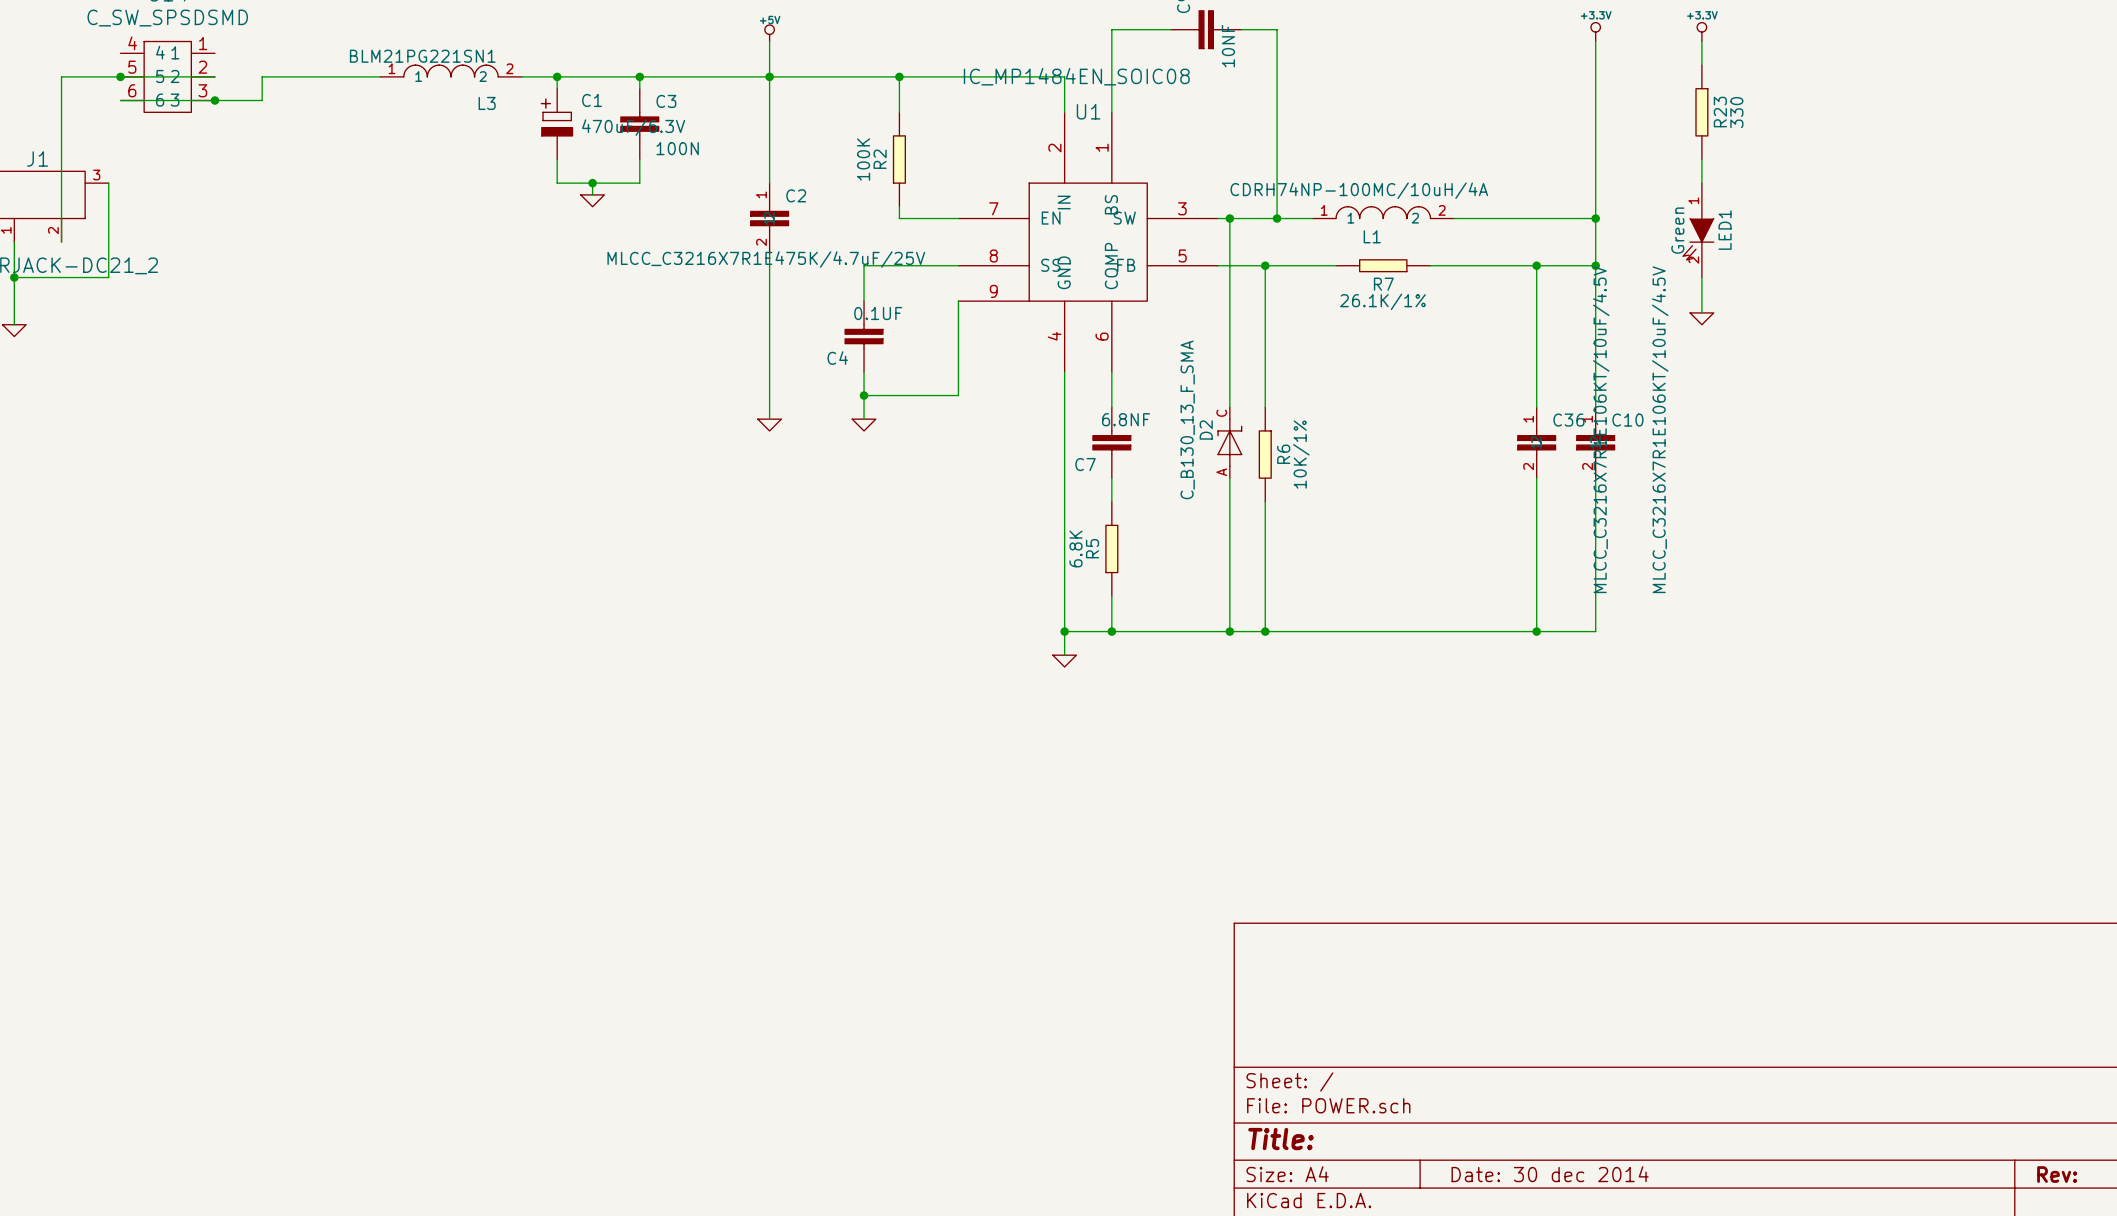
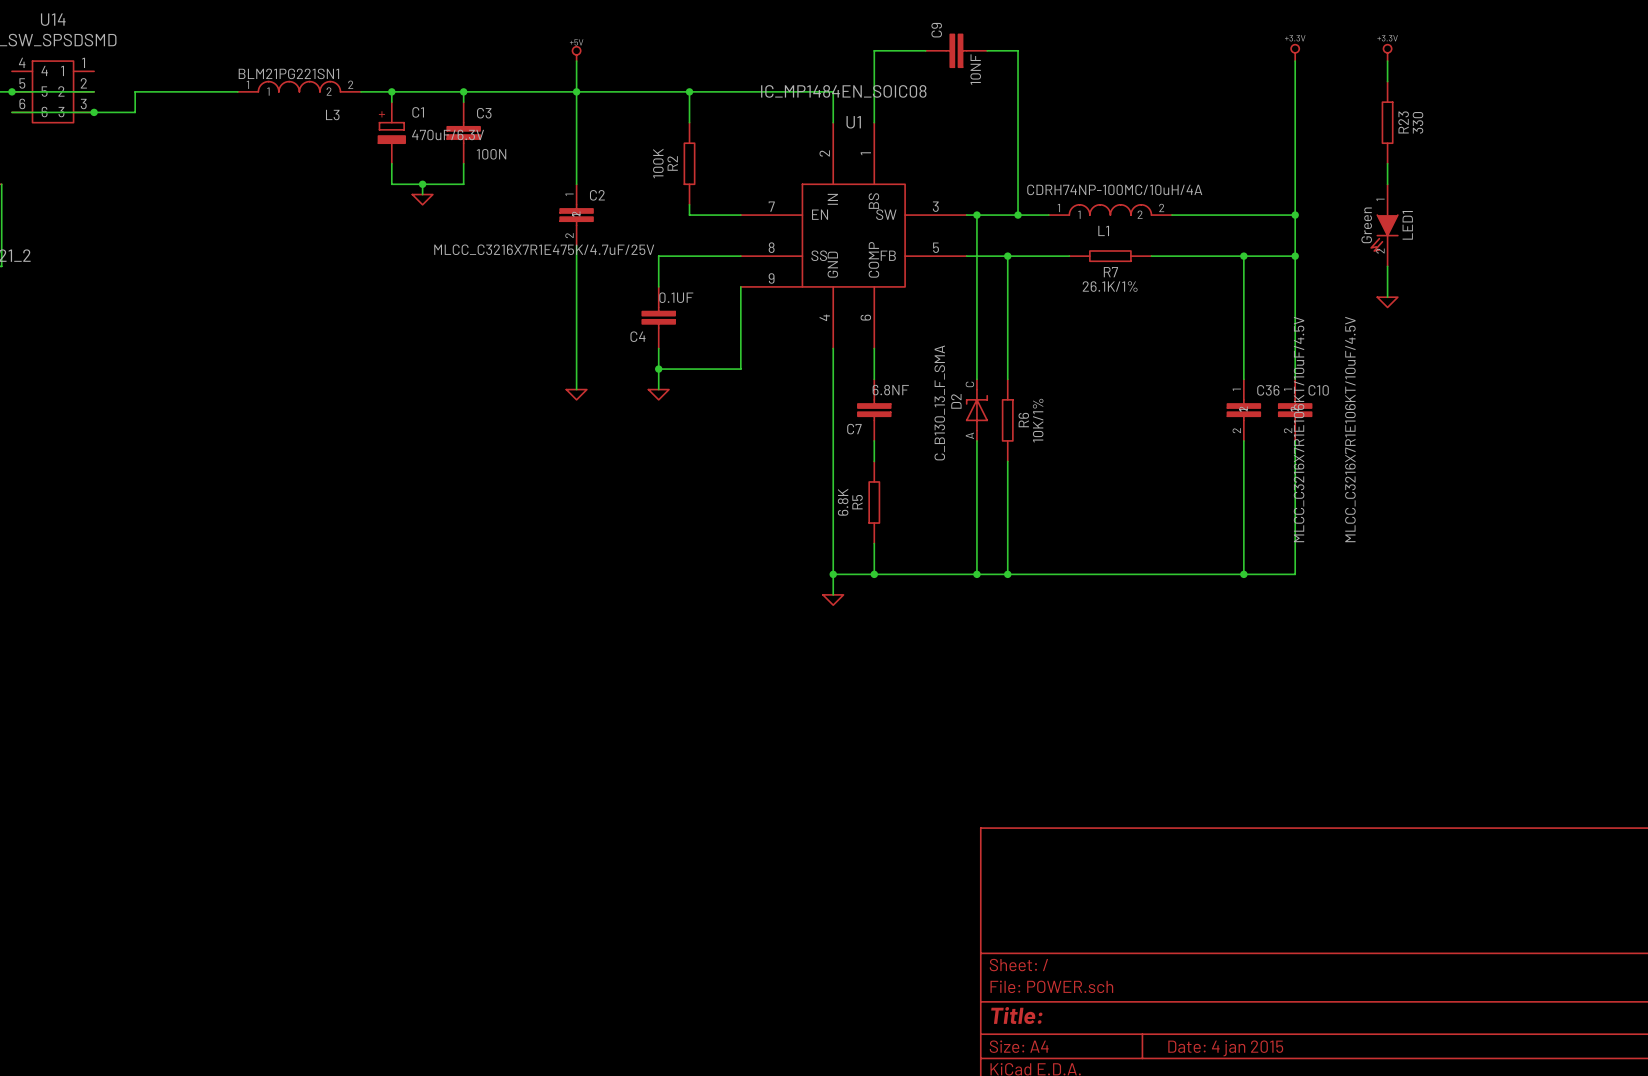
title block: Date: 30 dec 2014 (1550, 1174) -> Date: 4 jan 2015 (1225, 1048)

